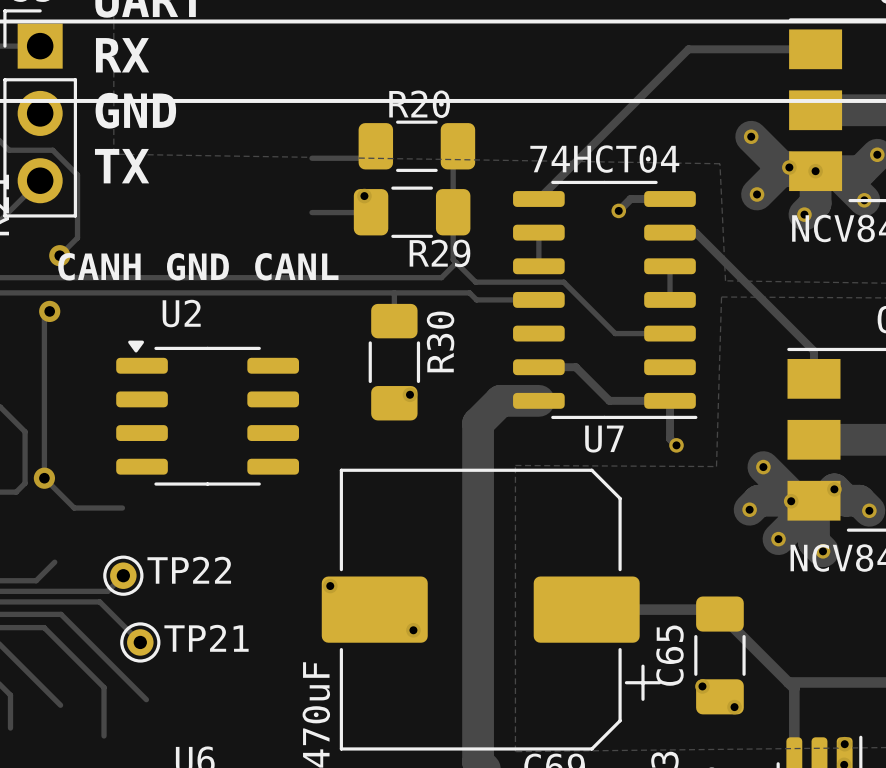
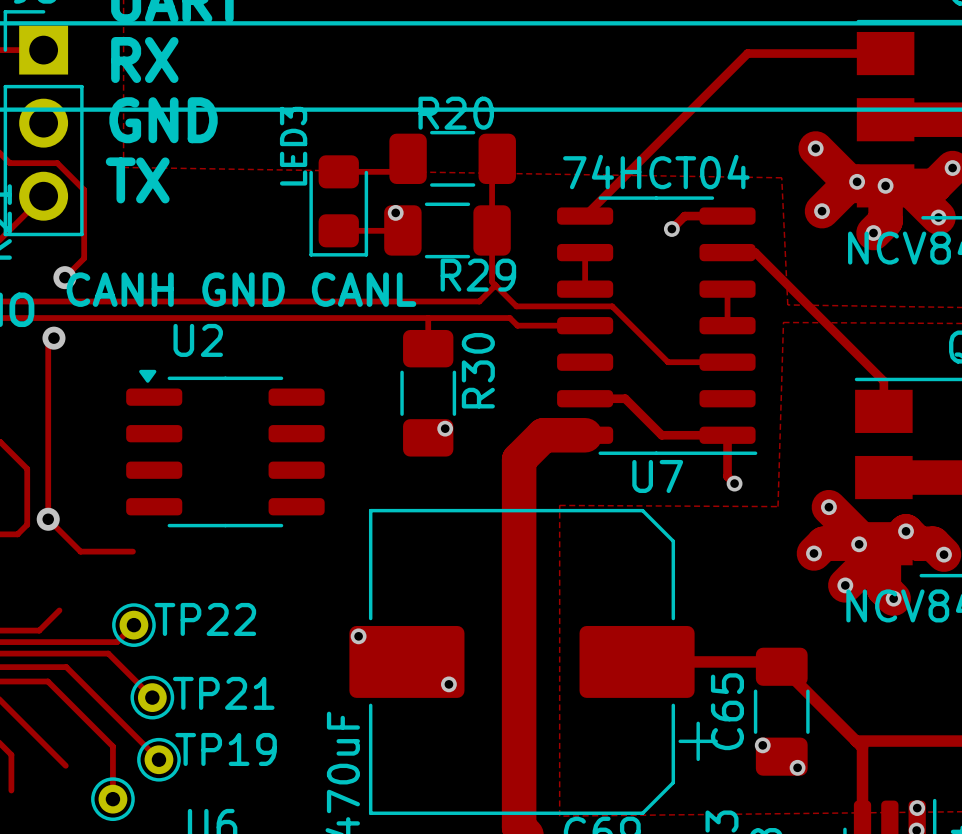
part: none -> LED3 (338, 205)
TP19: none -> (158, 759)
part: none -> (112, 799)

